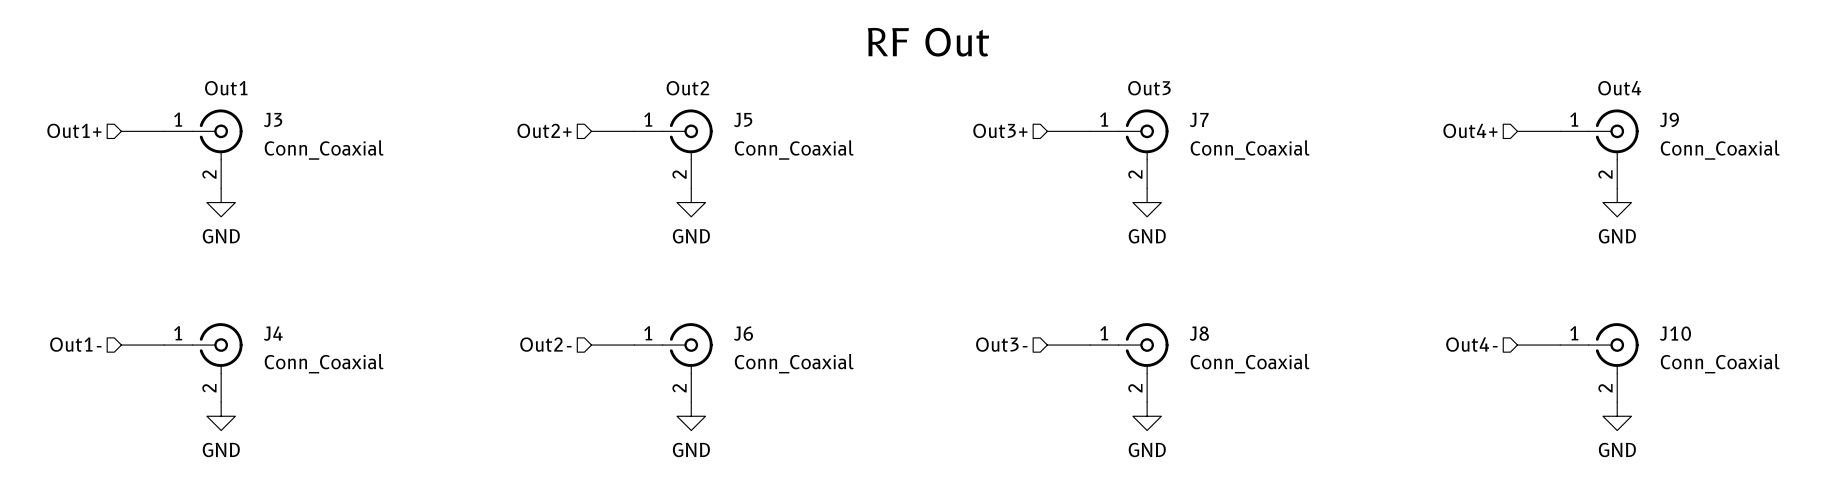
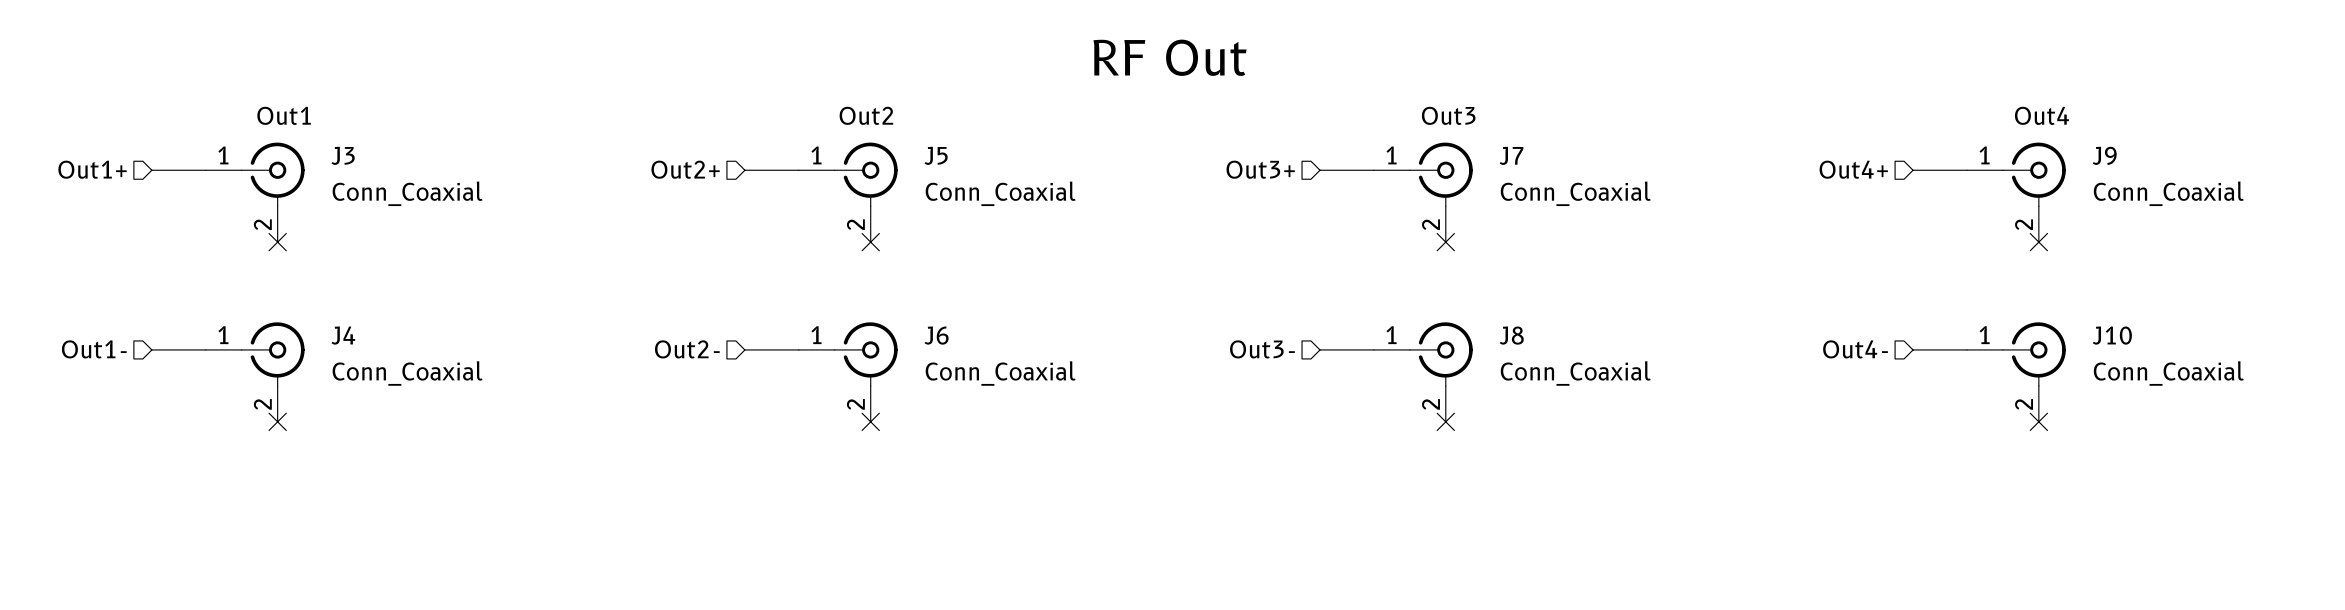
no-connect mark: none -> (277, 242)
no-connect mark: none -> (870, 242)
no-connect mark: none -> (1445, 242)
no-connect mark: none -> (2038, 242)
power symbol: GND (221, 202) -> none
power symbol: GND (691, 202) -> none
power symbol: GND (1147, 202) -> none
power symbol: GND (1617, 202) -> none
no-connect mark: none -> (277, 421)
no-connect mark: none -> (870, 421)
no-connect mark: none -> (1445, 421)
no-connect mark: none -> (2038, 421)
hierarchical label position: Out1- (75, 344) -> Out1- (94, 349)
hierarchical label position: Out2- (545, 344) -> Out2- (687, 349)
hierarchical label position: Out3- (1001, 344) -> Out3- (1262, 349)
hierarchical label position: Out4- (1471, 344) -> Out4- (1855, 349)
wire: (121, 345) (164, 345) -> (151, 349) (205, 349)
wire: (591, 345) (634, 345) -> (744, 349) (798, 349)
wire: (1047, 345) (1090, 345) -> (1319, 349) (1373, 349)
wire: (1517, 345) (1560, 345) -> (1913, 349) (1966, 349)
J4 position: (203, 362) -> (255, 372)
J6 position: (673, 362) -> (848, 372)
J8 position: (1129, 362) -> (1423, 372)
J10 position: (1599, 362) -> (2016, 372)
power symbol: GND (221, 416) -> none
power symbol: GND (691, 416) -> none
power symbol: GND (1147, 416) -> none
power symbol: GND (1617, 416) -> none

